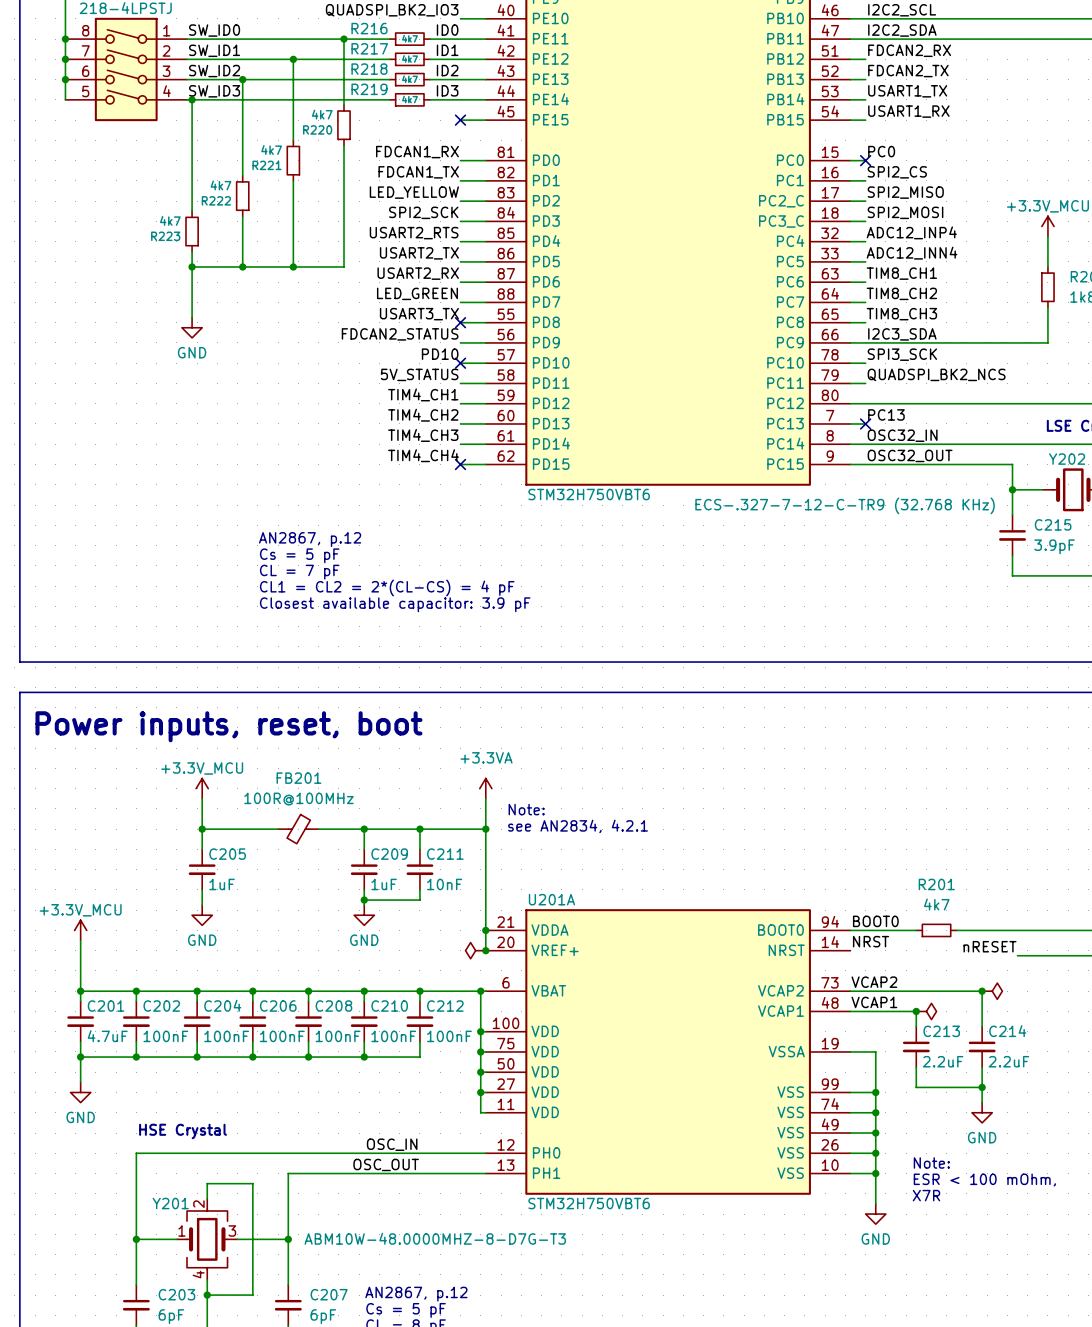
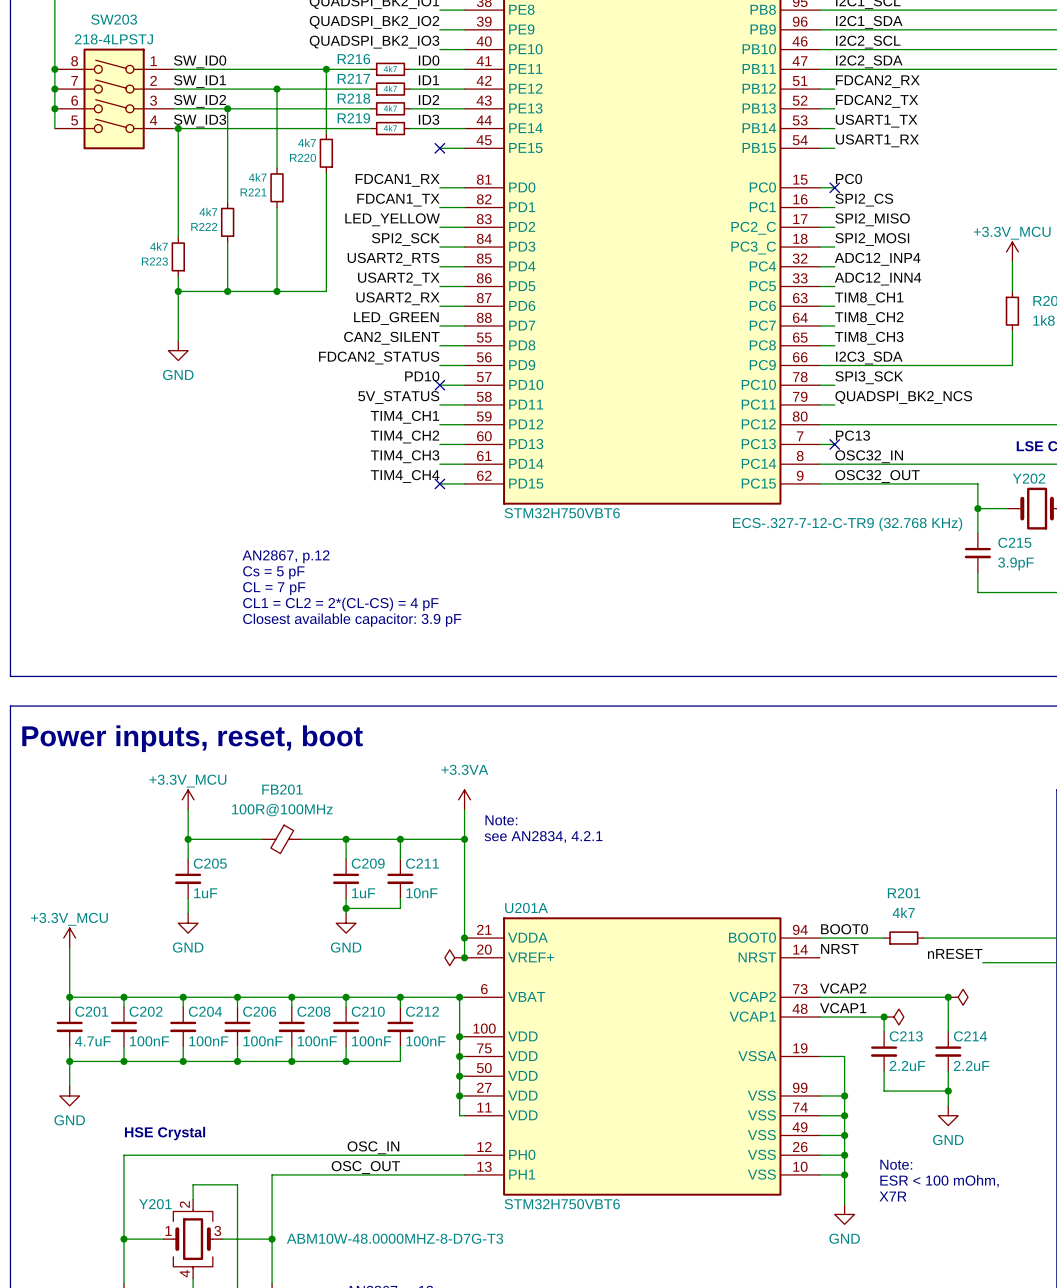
label: USART3_TX (419, 314) -> CAN2_SILENT (391, 338)
no-connect mark: (460, 322) -> none

